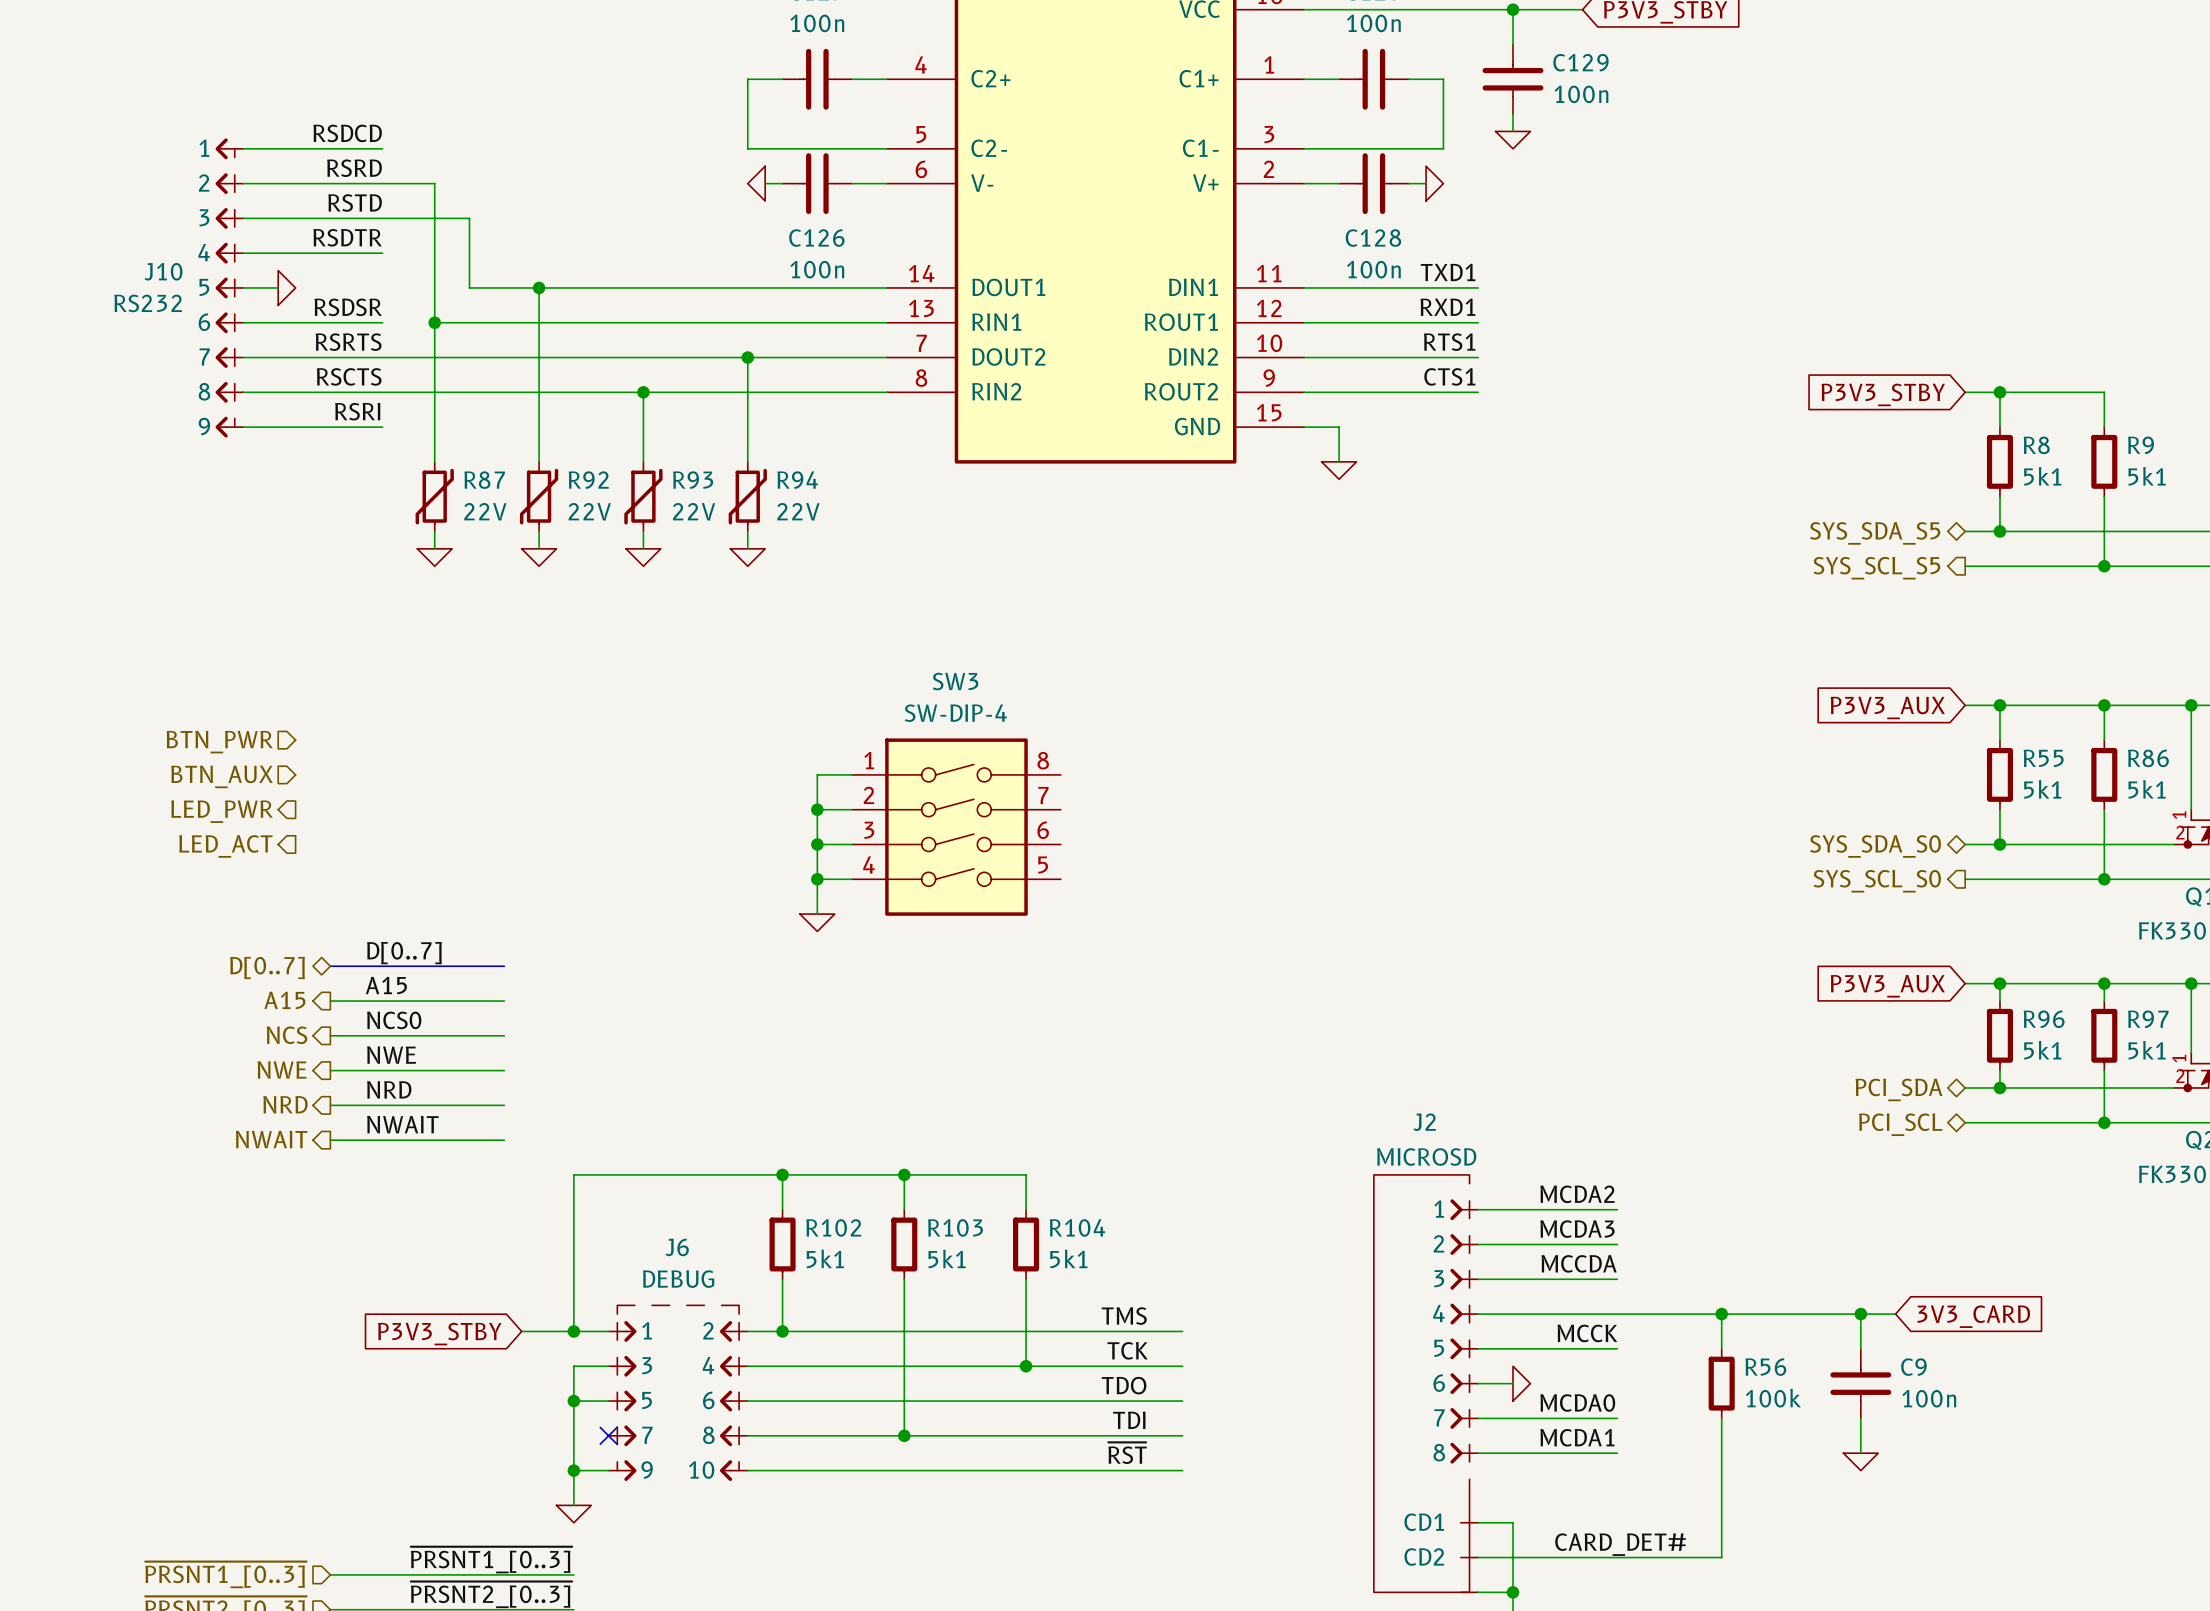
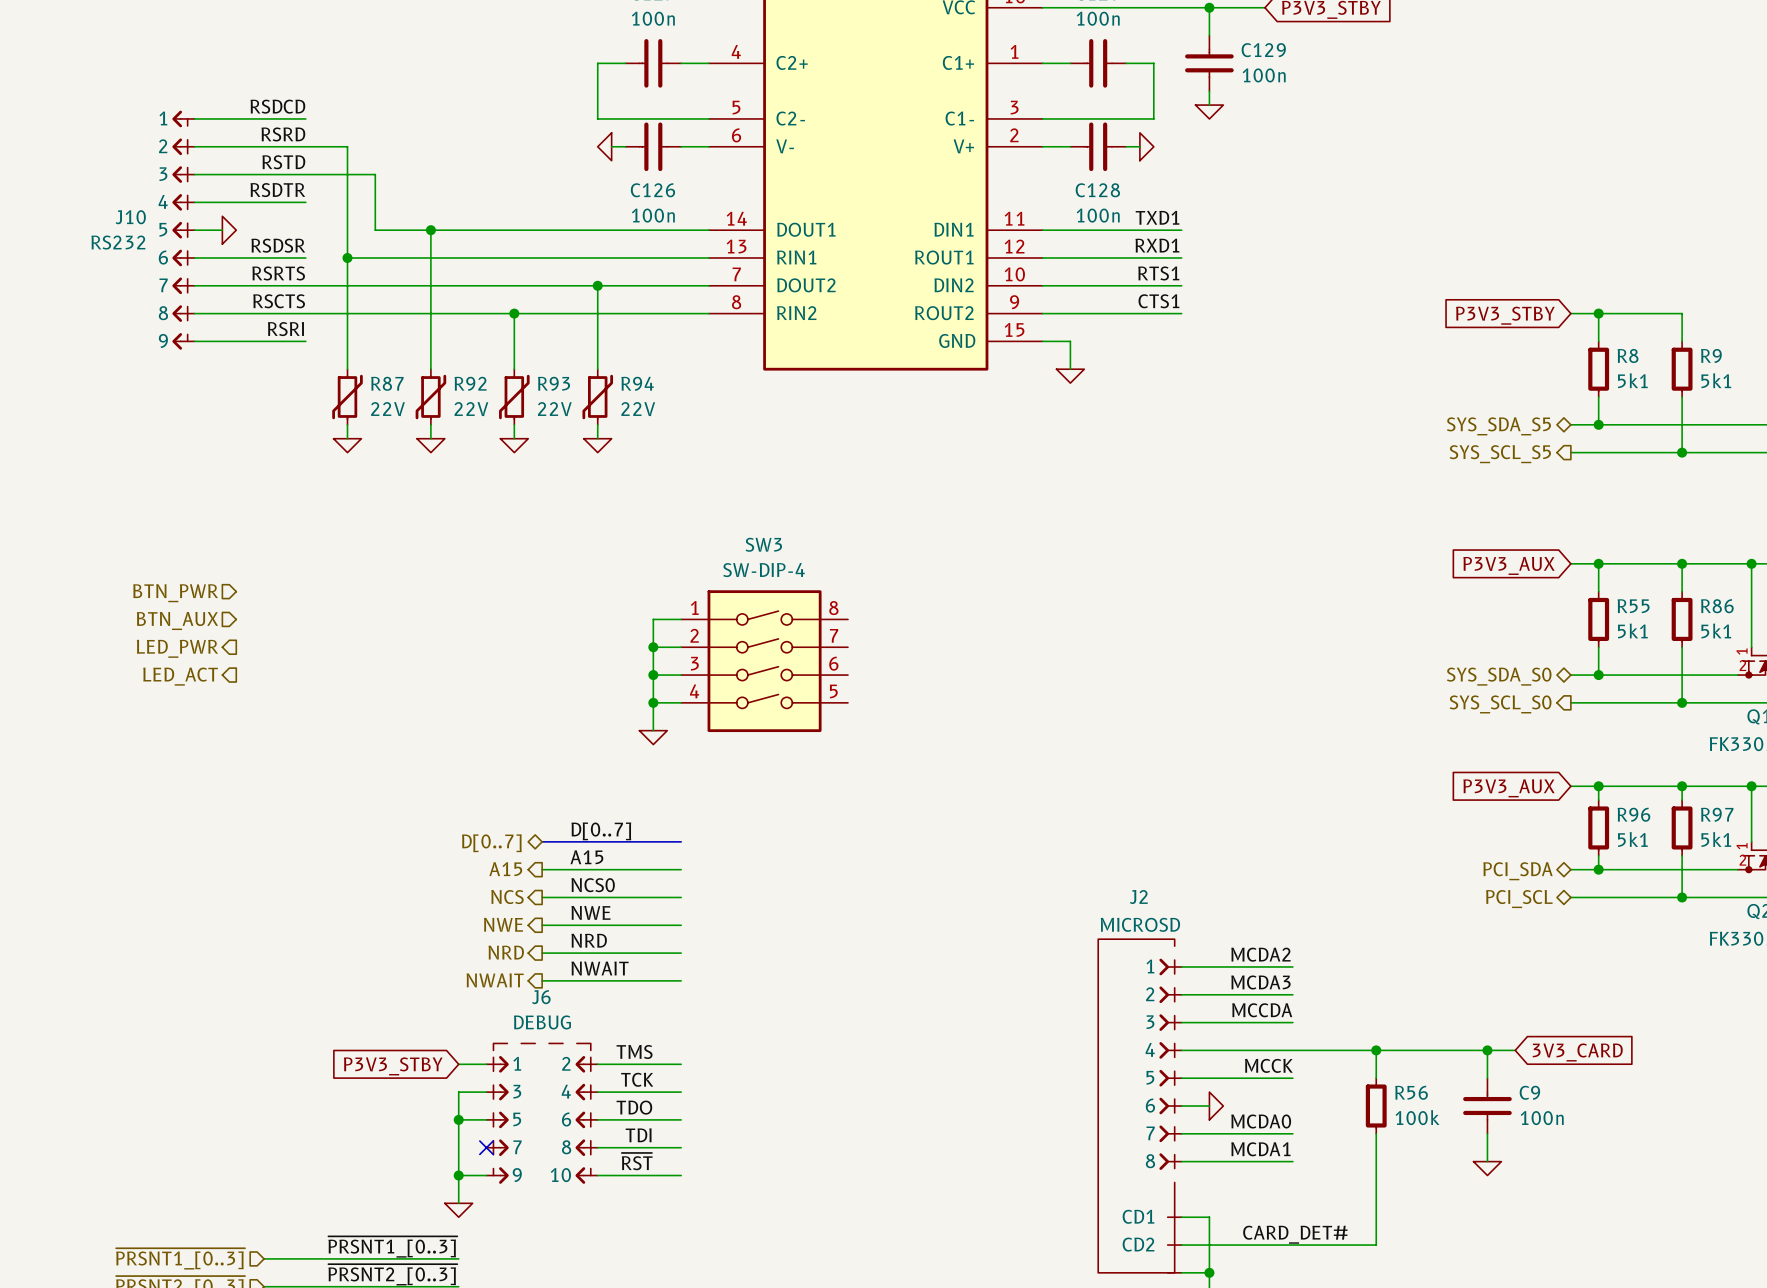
label: D[0..7] (404, 953) -> none
bus: (330, 966) (504, 966) -> none
hierarchical label: D[0..7] (267, 967) -> none
label: A15 (386, 985) -> none
hierarchical label: A15 (284, 1000) -> none
wire: (330, 1001) (504, 1001) -> none
label: NCS0 (394, 1020) -> none
hierarchical label: NCS (287, 1035) -> none
wire: (330, 1035) (504, 1035) -> none
label: none -> D[0..7] (601, 831)
bus: none -> (542, 841) (681, 841)
hierarchical label: none -> D[0..7] (491, 843)
label: NWE (391, 1055) -> none
hierarchical label: NWE (282, 1069) -> none
wire: (330, 1070) (504, 1070) -> none
label: none -> A15 (586, 857)
hierarchical label: none -> A15 (505, 869)
wire: none -> (542, 869) (681, 869)
label: NRD (389, 1089) -> none
hierarchical label: NRD (285, 1104) -> none
wire: (330, 1105) (504, 1105) -> none
label: none -> NCS0 (593, 885)
hierarchical label: none -> NCS (507, 897)
wire: none -> (542, 897) (681, 897)
label: NWAIT (402, 1124) -> none
hierarchical label: NWAIT (271, 1139) -> none
wire: (330, 1140) (504, 1140) -> none
label: none -> NWE (591, 912)
hierarchical label: none -> NWE (503, 924)
wire: none -> (542, 925) (681, 925)
wire: (782, 1174) (782, 1209) -> none
junction: (782, 1174) -> none
wire: (904, 1174) (904, 1209) -> none
junction: (904, 1174) -> none
label: none -> NRD (589, 940)
hierarchical label: none -> NRD (506, 952)
wire: none -> (542, 953) (681, 953)
wire: (1026, 1209) (1026, 1174) (573, 1174) (573, 1331) (521, 1331) -> none
label: none -> NWAIT (600, 968)
hierarchical label: none -> NWAIT (495, 980)
wire: none -> (542, 980) (681, 980)
R102: 5k1 (782, 1244) -> none
R103: 5k1 (904, 1244) -> none
R104: 5k1 (1026, 1244) -> none
wire: (782, 1279) (782, 1331) -> none
wire: (904, 1279) (904, 1435) -> none
wire: (1026, 1279) (1026, 1366) -> none
label position: TMS (1124, 1316) -> TMS (634, 1051)
junction: (573, 1331) -> none
junction: (782, 1331) -> none
wire: (852, 1331) (1182, 1331) -> none
global label position: P3V3_STBY (439, 1334) -> P3V3_STBY (393, 1066)
label position: TCK (1127, 1350) -> TCK (637, 1079)
wire: (852, 1366) (1182, 1366) -> none
junction: (1026, 1366) -> none
label position: TDO (1124, 1385) -> TDO (634, 1107)
wire: (852, 1401) (1182, 1401) -> none
label position: TDI (1129, 1420) -> TDI (638, 1135)
wire: (852, 1435) (1182, 1435) -> none
junction: (904, 1435) -> none
label position: ~{RST} (1127, 1453) -> ~{RST} (637, 1161)
wire: (852, 1470) (1182, 1470) -> none

